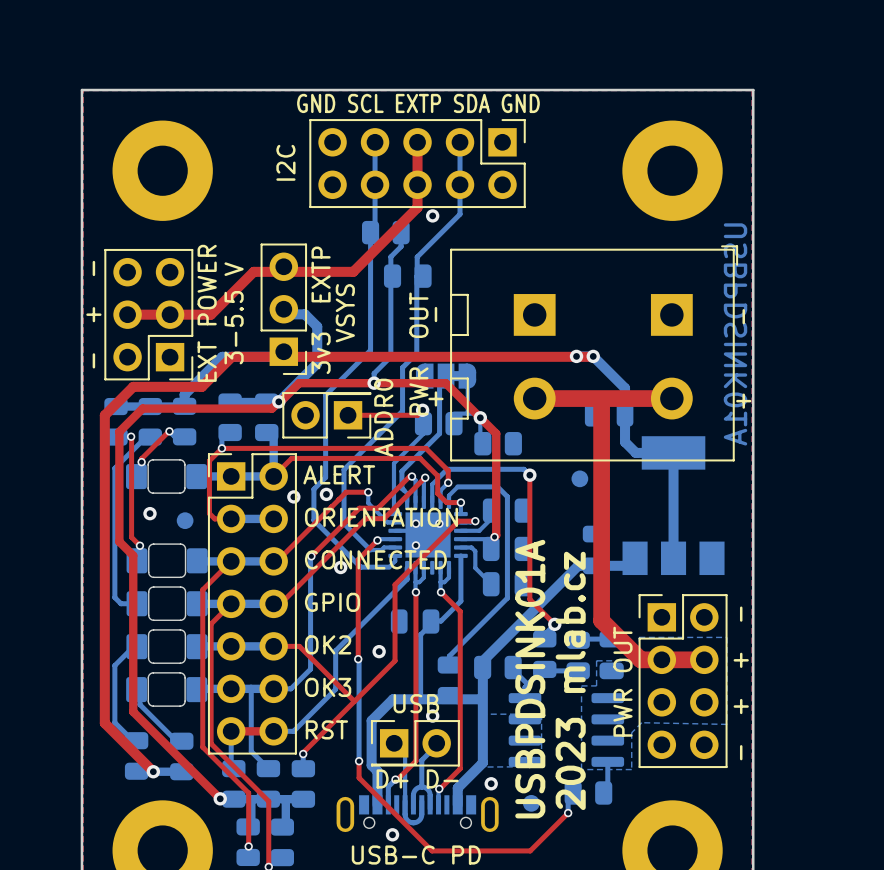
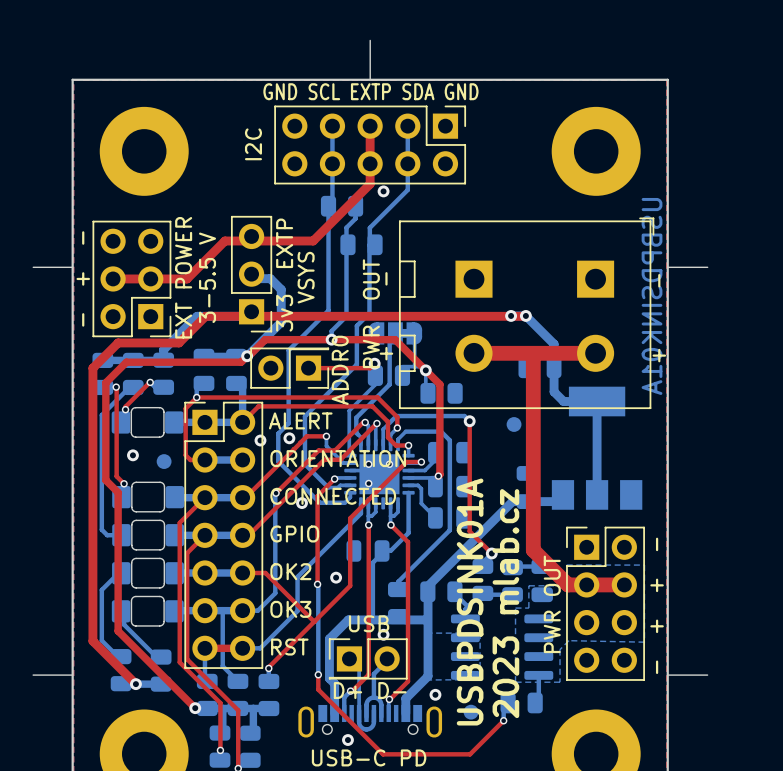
board edge: none -> (370, 40) (370, 79)
board edge: none -> (33, 267) (72, 267)
board edge: none -> (668, 267) (707, 267)
board edge: none -> (33, 675) (72, 675)
board edge: none -> (668, 675) (707, 675)

